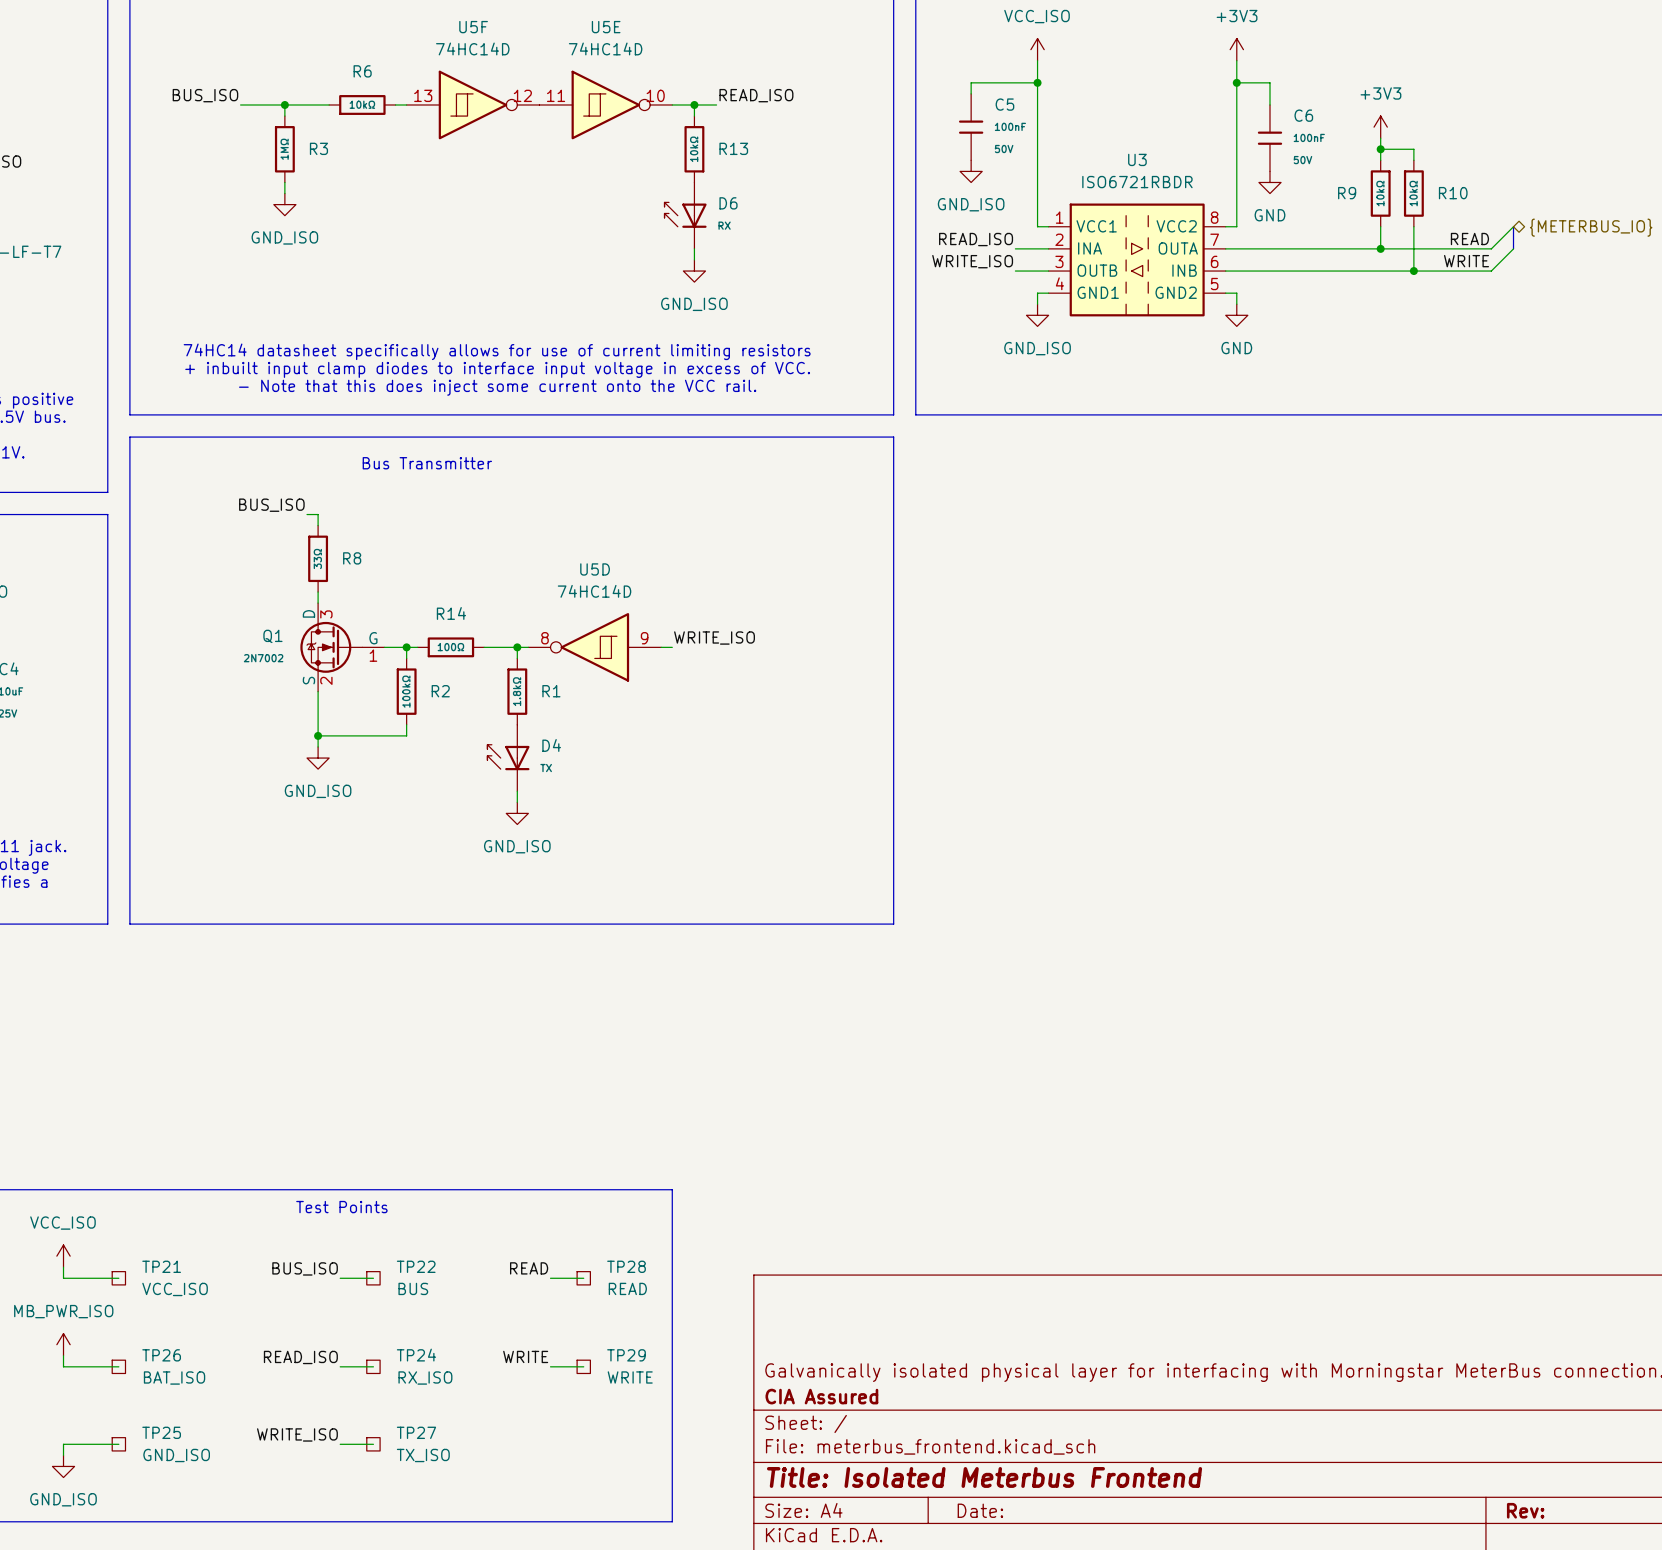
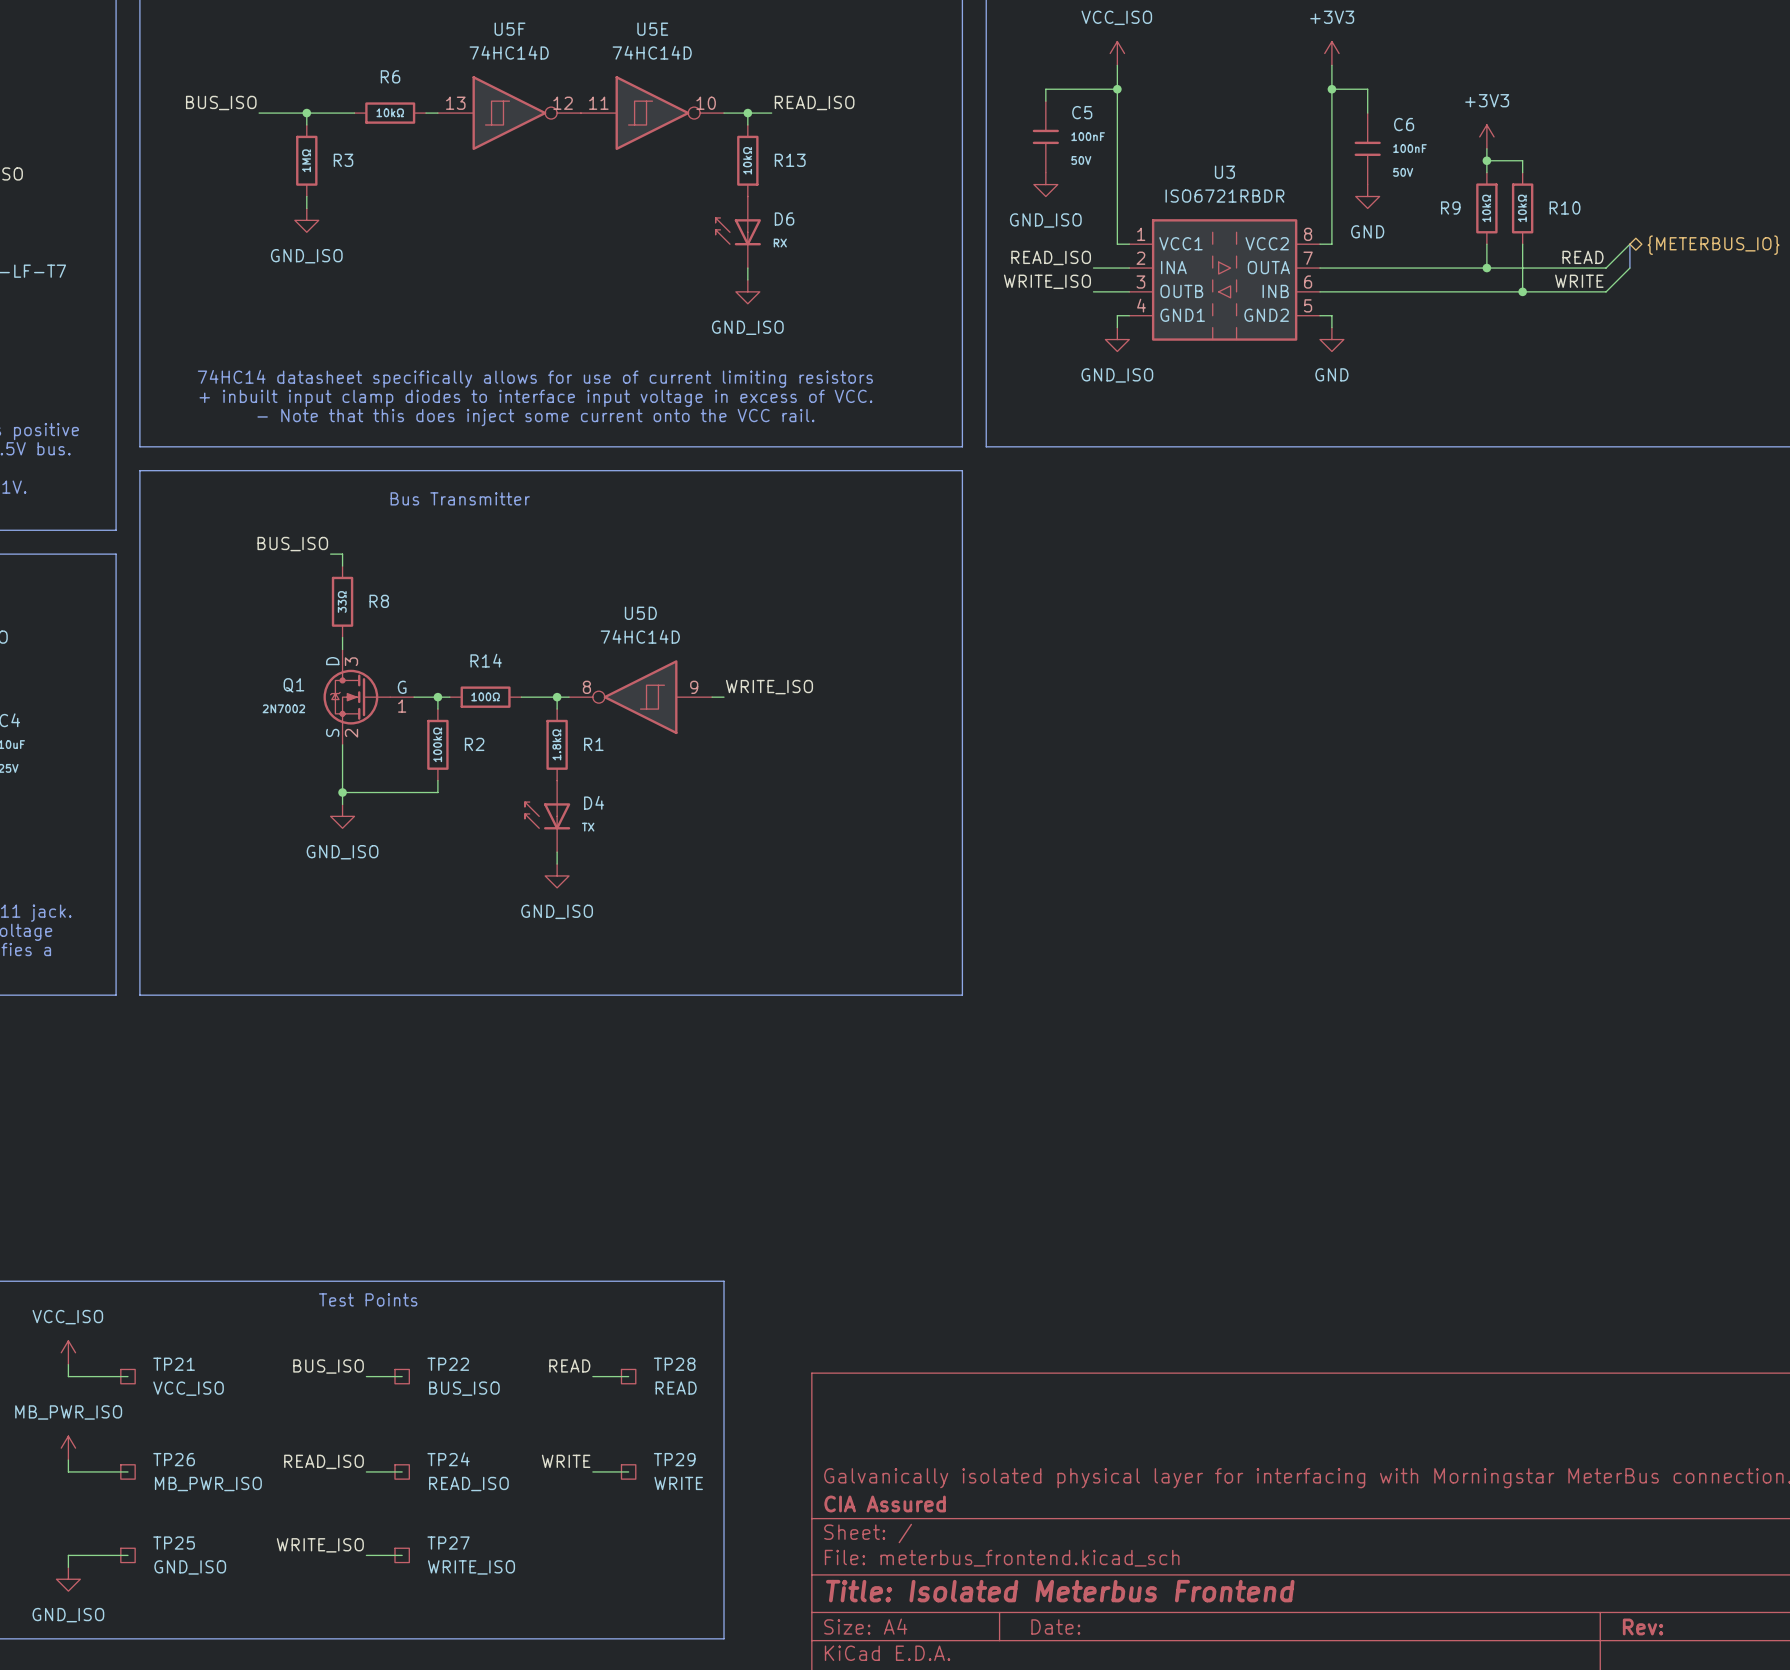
TP22 value: BUS (413, 1288) -> BUS_ISO (464, 1388)
TP26 value: BAT_ISO (174, 1378) -> MB_PWR_ISO (208, 1484)
TP24 value: RX_ISO (425, 1378) -> READ_ISO (468, 1484)
TP27 value: TX_ISO (423, 1455) -> WRITE_ISO (471, 1567)

